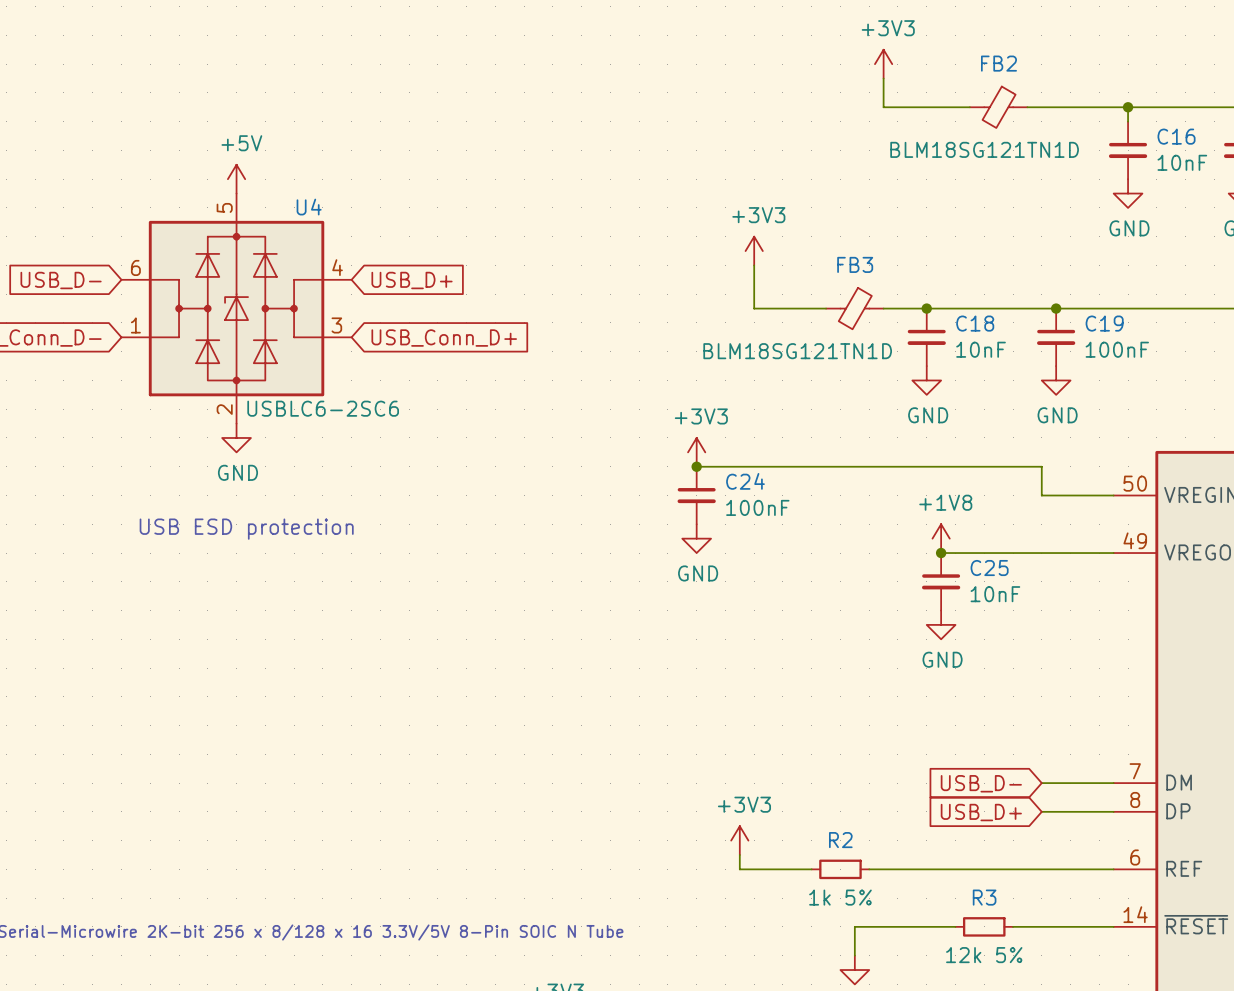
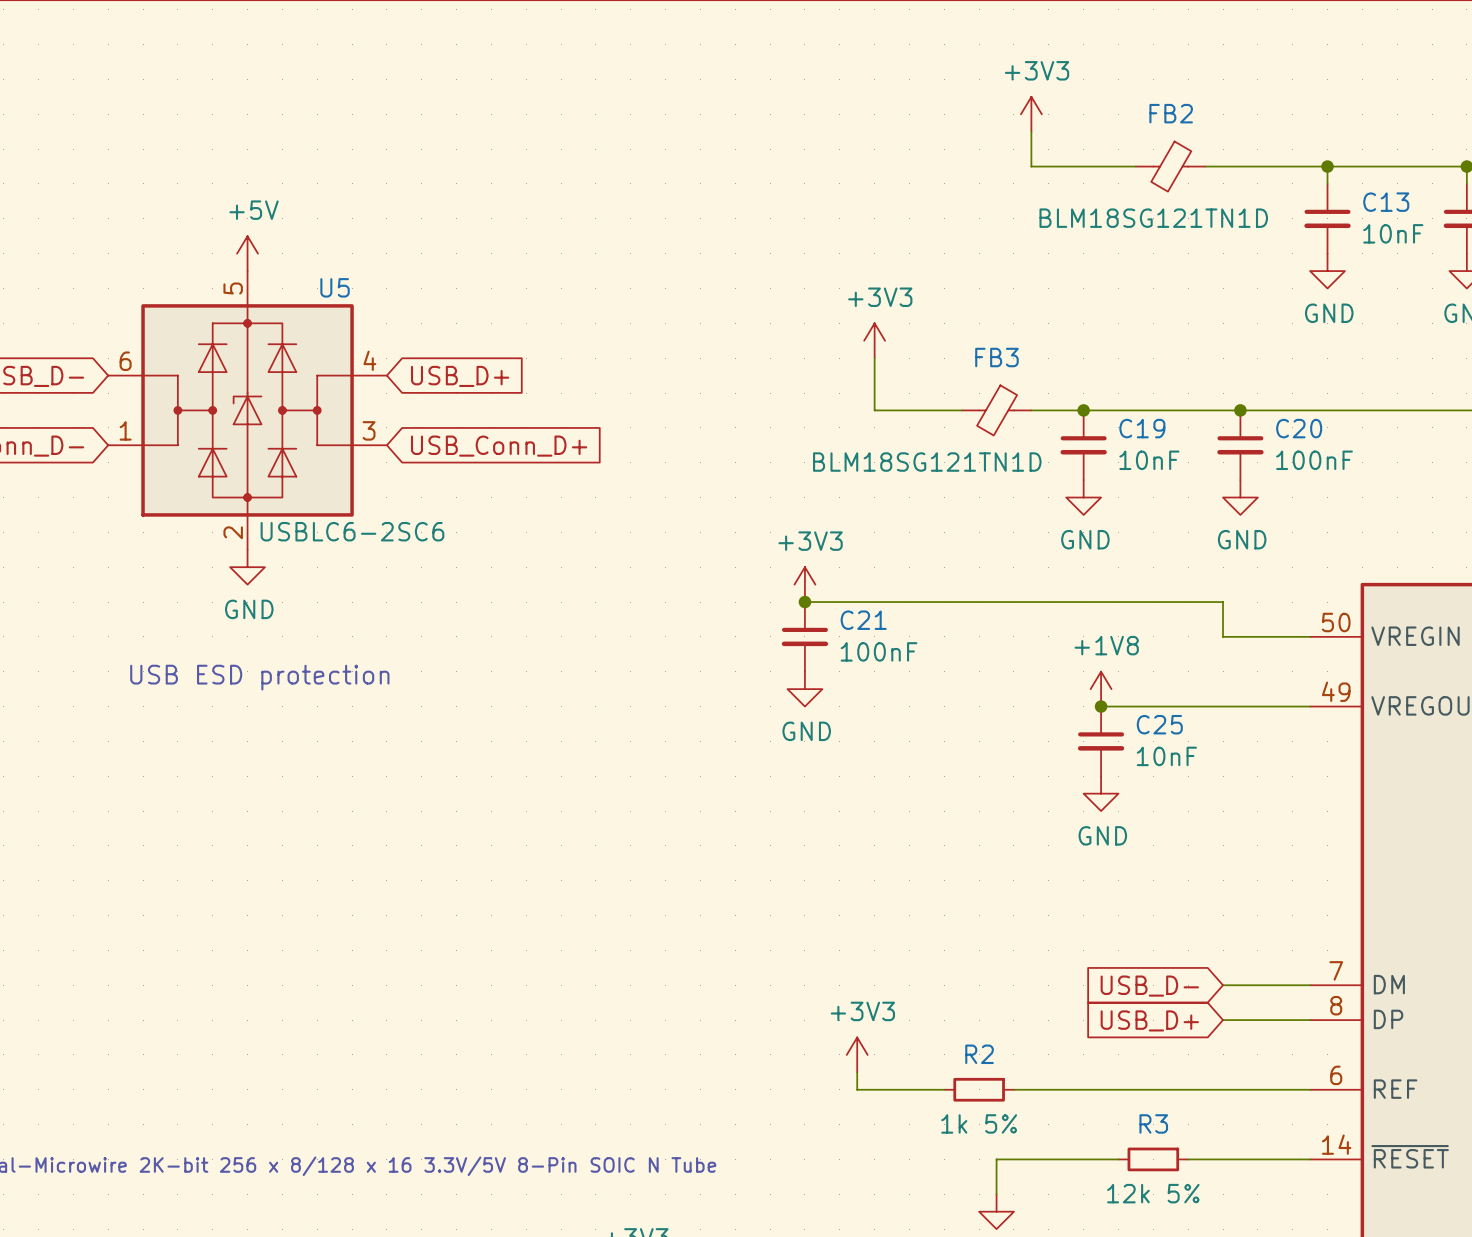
C16 name: C16 (1176, 136) -> C13 (1386, 202)
U4 name: U4 (309, 207) -> U5 (335, 287)
C18 name: C18 (975, 323) -> C19 (1142, 428)
C19 name: C19 (1104, 323) -> C20 (1299, 428)
C24 name: C24 (745, 481) -> C21 (863, 620)

